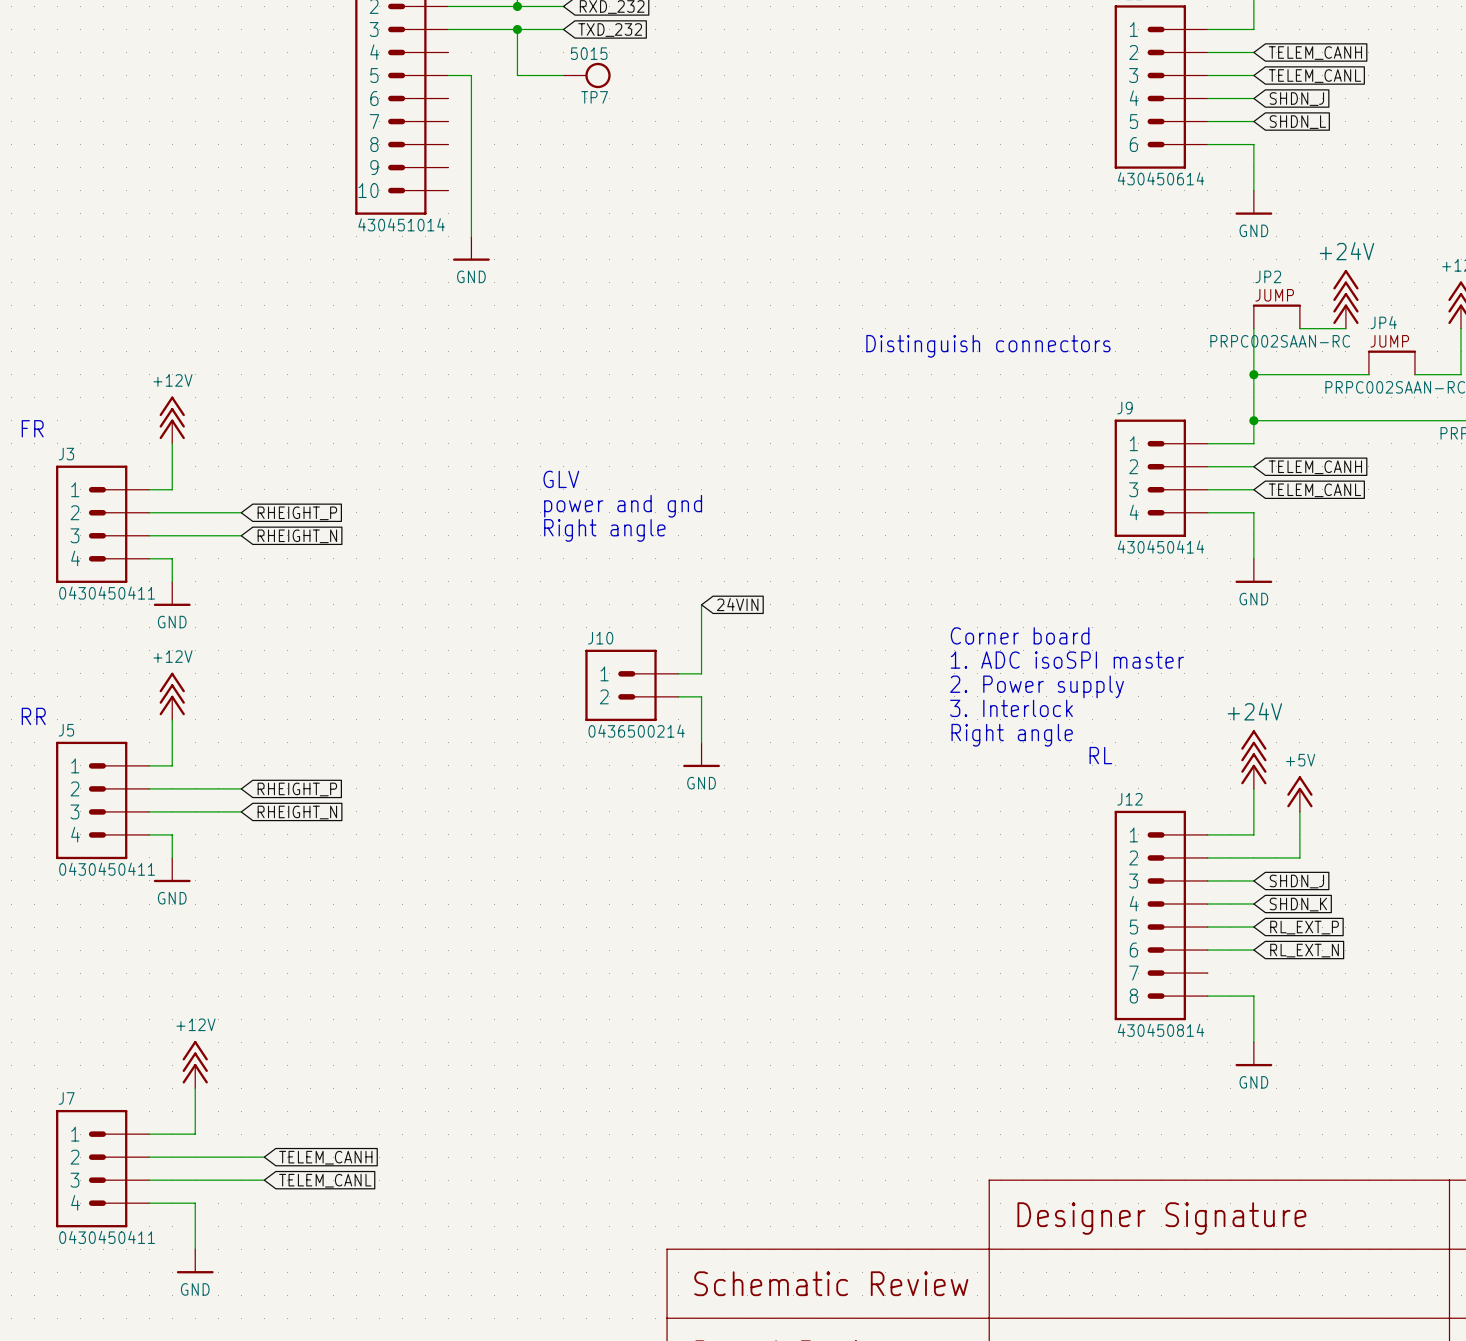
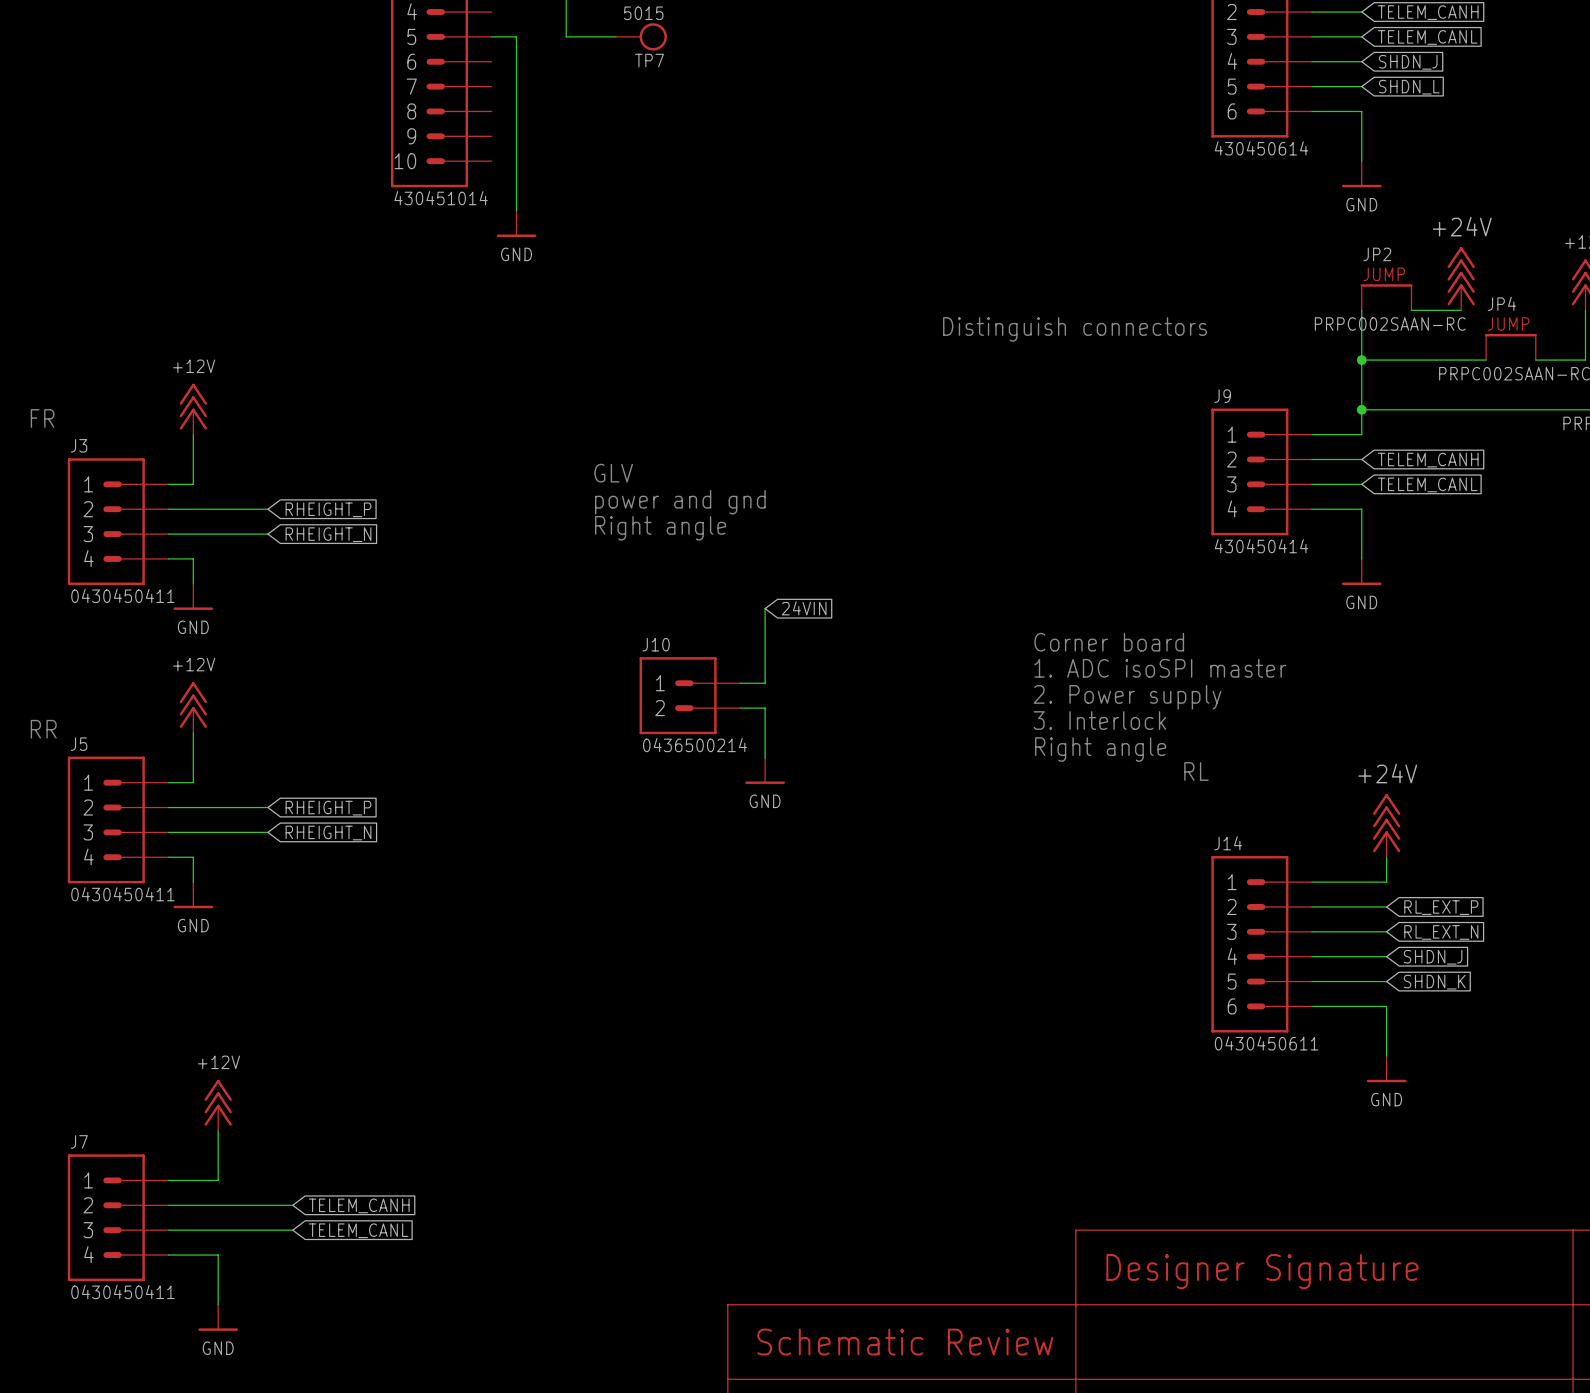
power symbol position: +24V (1253, 759) -> +24V (1386, 825)
wire: (1253, 788) (1253, 834) (1207, 834) -> none
power symbol: +5V (1299, 794) -> none
wire: (1299, 811) (1299, 857) (1276, 857) -> (1386, 857) (1386, 882)
wire: none -> (1361, 906) (1386, 906)
global label position: SHDN_J (1296, 881) -> SHDN_J (1433, 957)
wire: none -> (1361, 931) (1386, 931)
global label position: SHDN_K (1298, 904) -> SHDN_K (1434, 982)
J12: (1161, 915) -> none
J14: none -> (1261, 944)
wire: none -> (1361, 956) (1386, 956)
global label position: RL_EXT_P (1304, 927) -> RL_EXT_P (1441, 907)
wire: none -> (1361, 981) (1386, 981)
global label position: RL_EXT_N (1304, 950) -> RL_EXT_N (1441, 932)
wire: none -> (1312, 1006) (1386, 1006) (1386, 1056)
wire: (1207, 996) (1253, 996) (1253, 1042) -> none
power symbol position: GND (1253, 1054) -> GND (1386, 1069)

